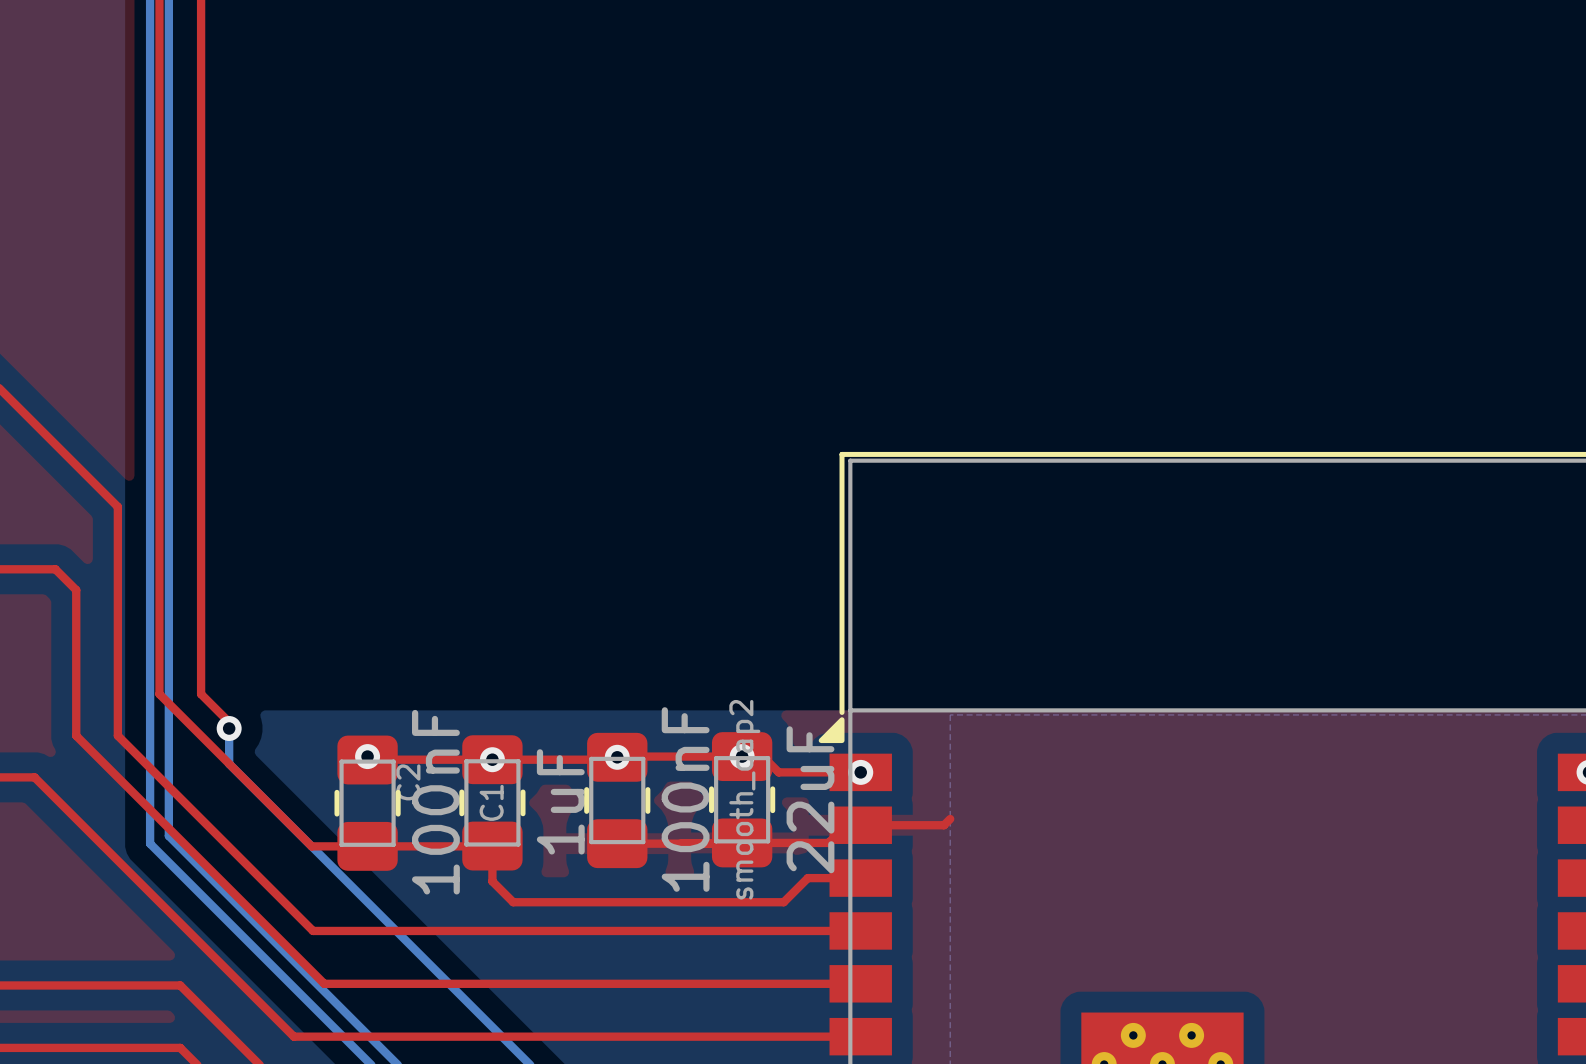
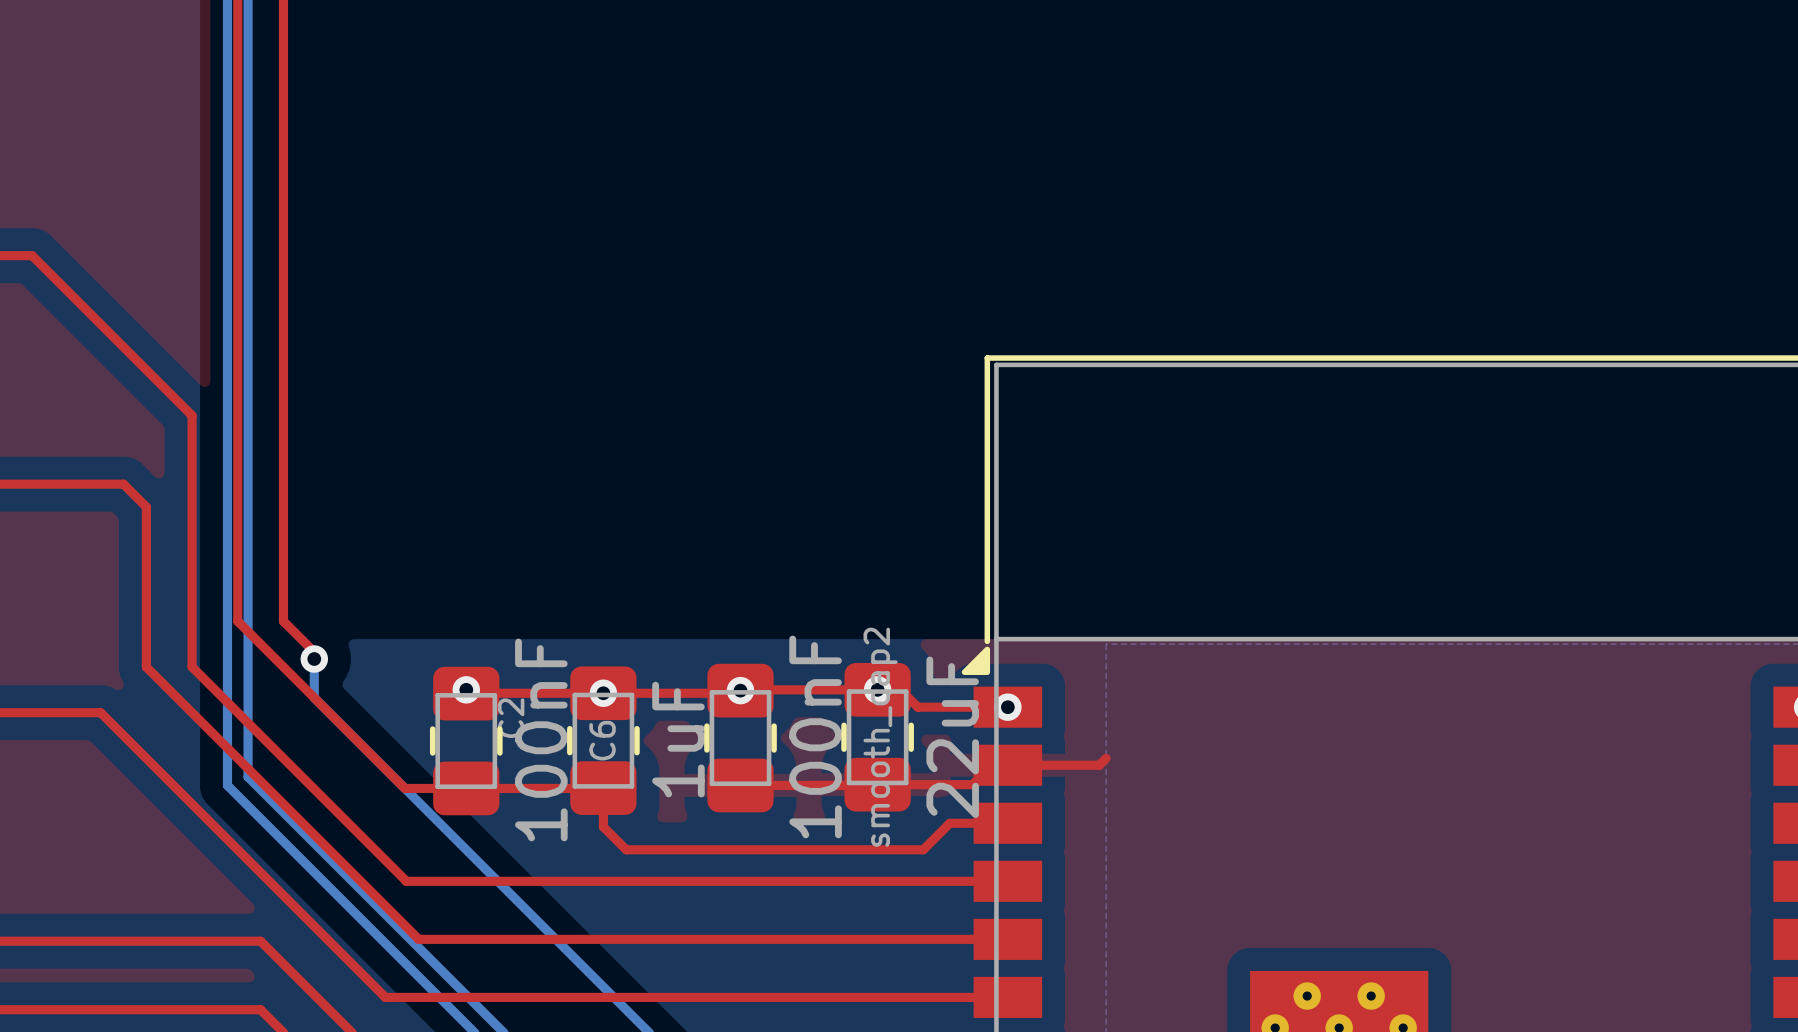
C1 name: C1 (491, 802) -> C6 (602, 740)

